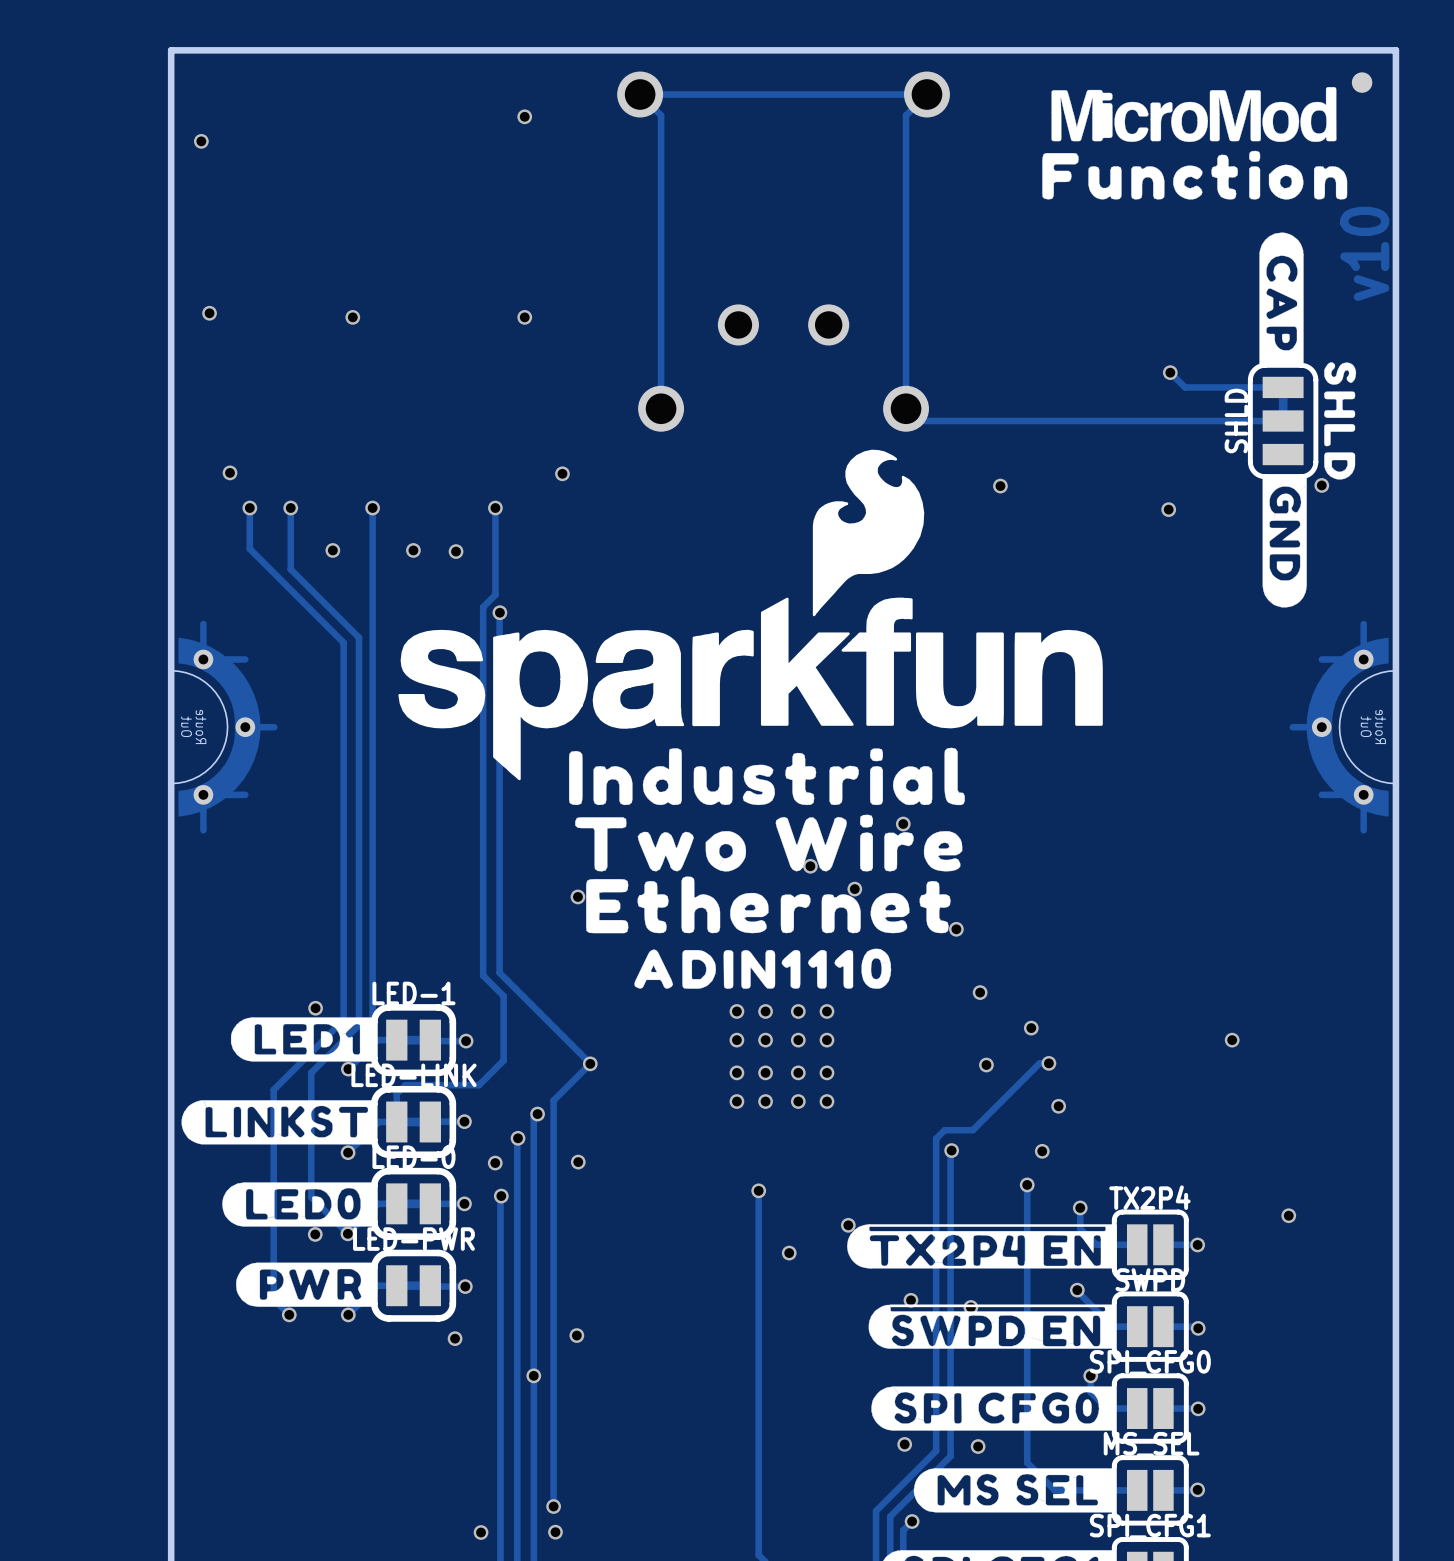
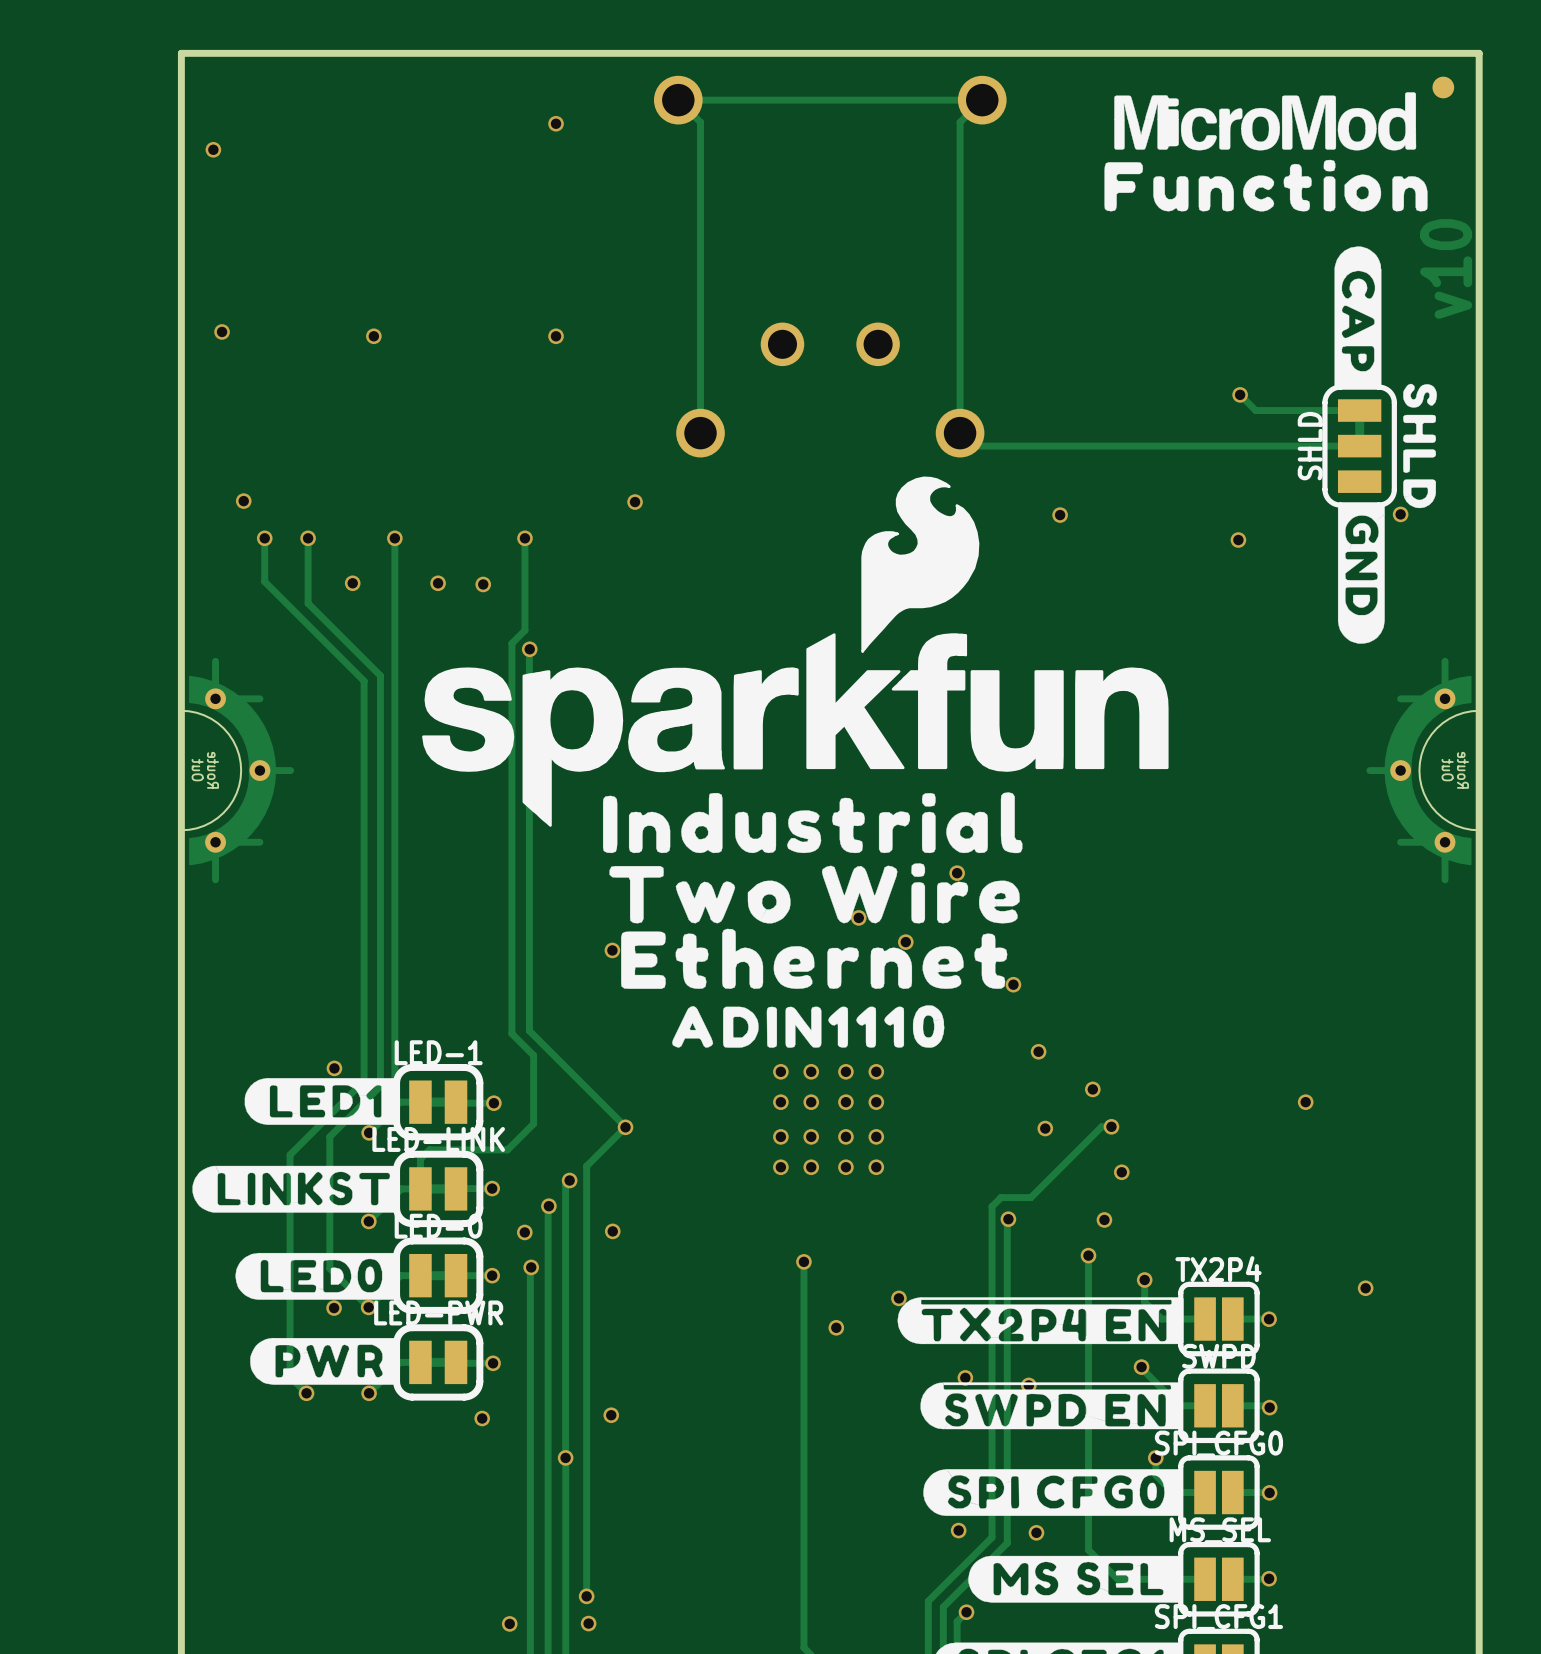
via position: (562, 473) -> (635, 502)

